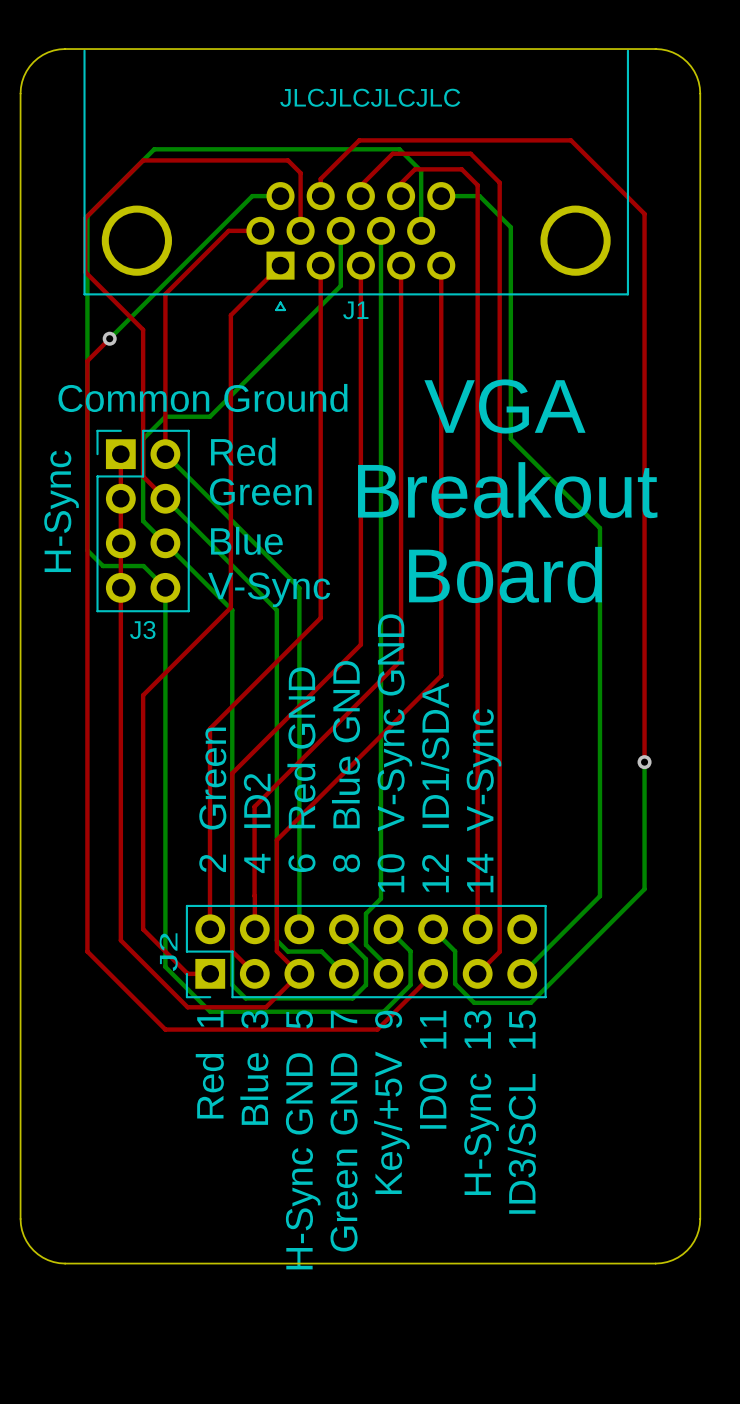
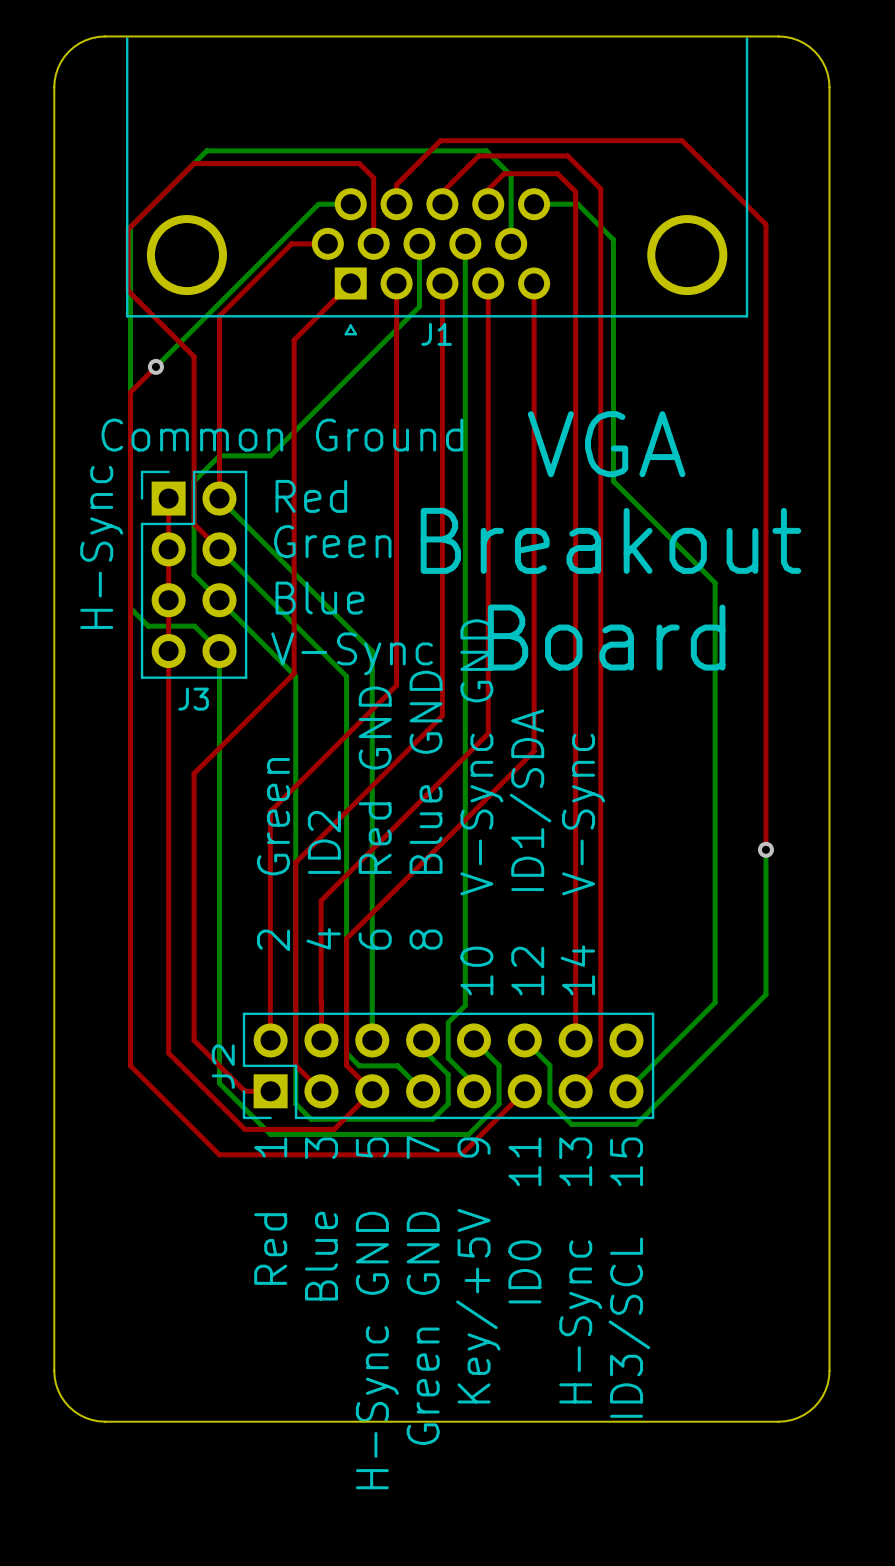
text: JLCJLCJLCJLC (370, 97) -> none

